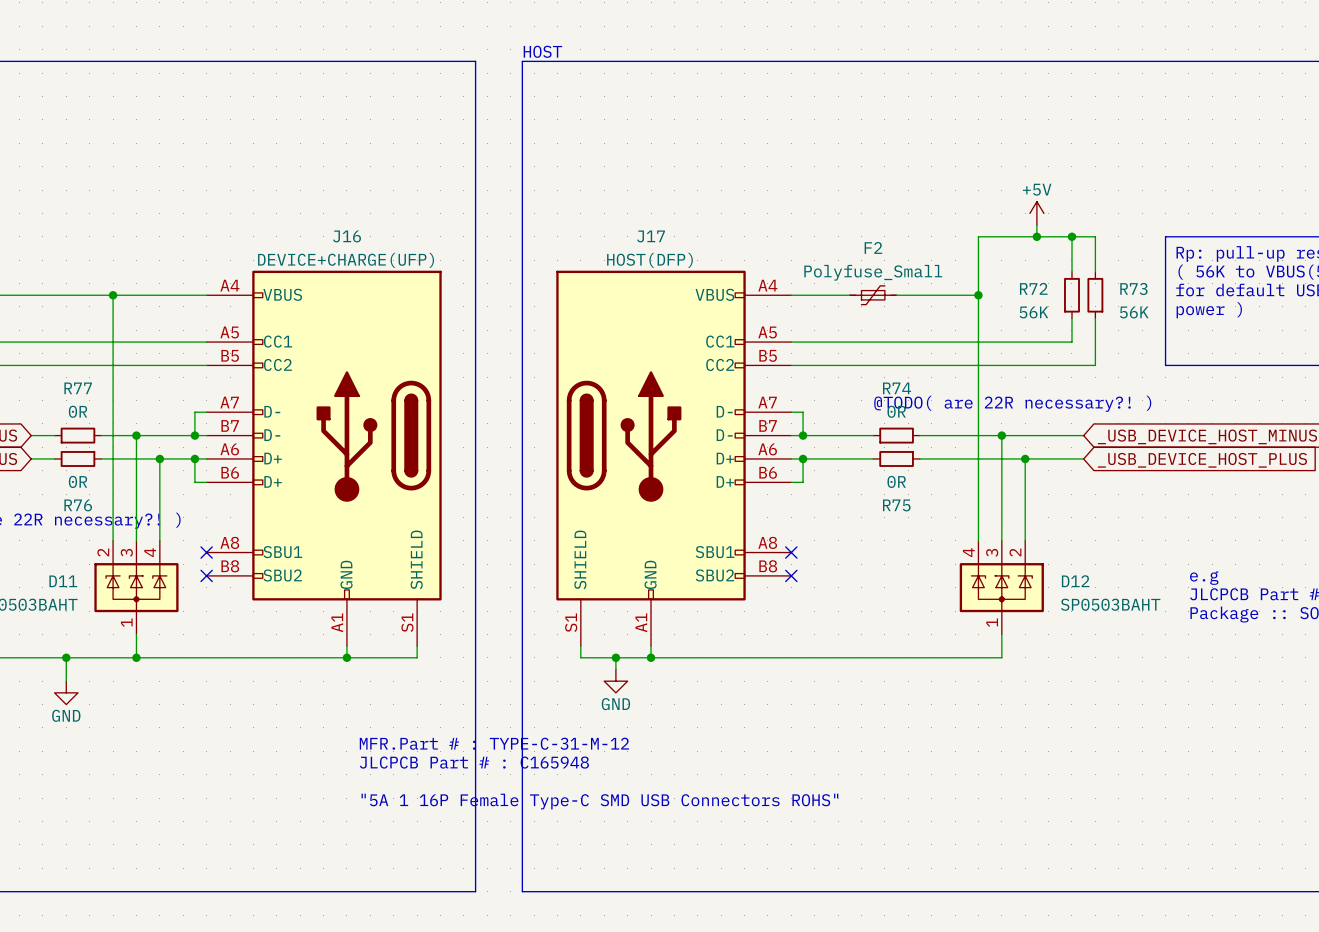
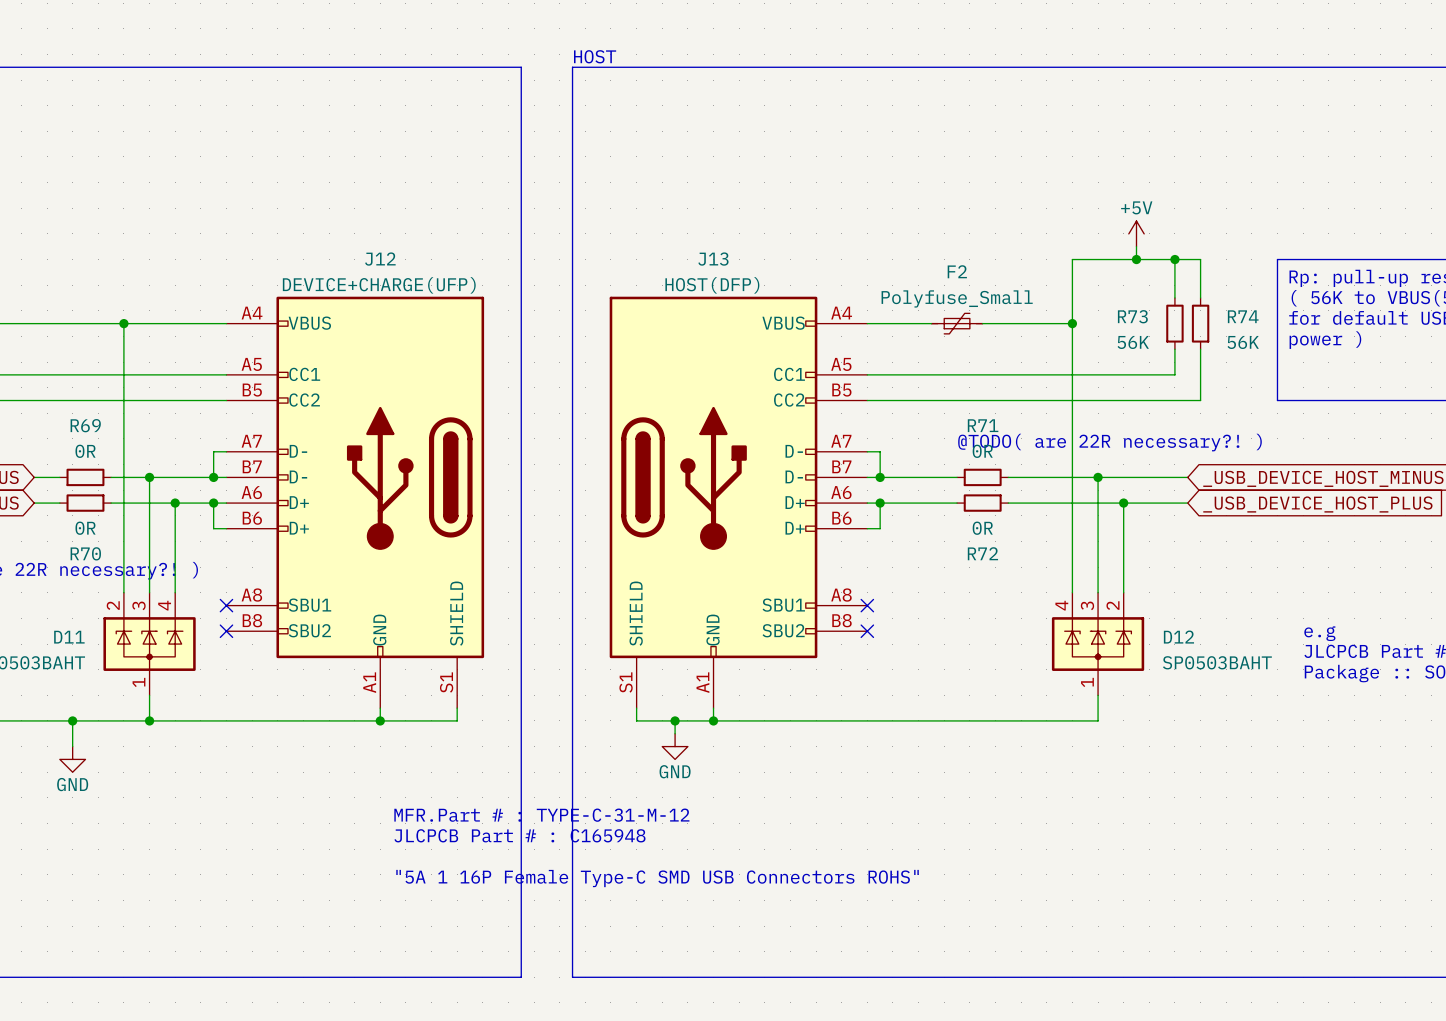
J16 name: J16 (347, 236) -> J12 (380, 259)
J17 name: J17 (651, 236) -> J13 (713, 259)
R72 name: R72 (1033, 288) -> R73 (1132, 316)
R73 name: R73 (1133, 288) -> R74 (1243, 316)
R77 name: R77 (78, 388) -> R69 (85, 425)
R74 name: R74 (897, 388) -> R71 (983, 425)
R76 name: R76 (78, 505) -> R70 (85, 553)
R75 name: R75 (896, 505) -> R72 (982, 553)

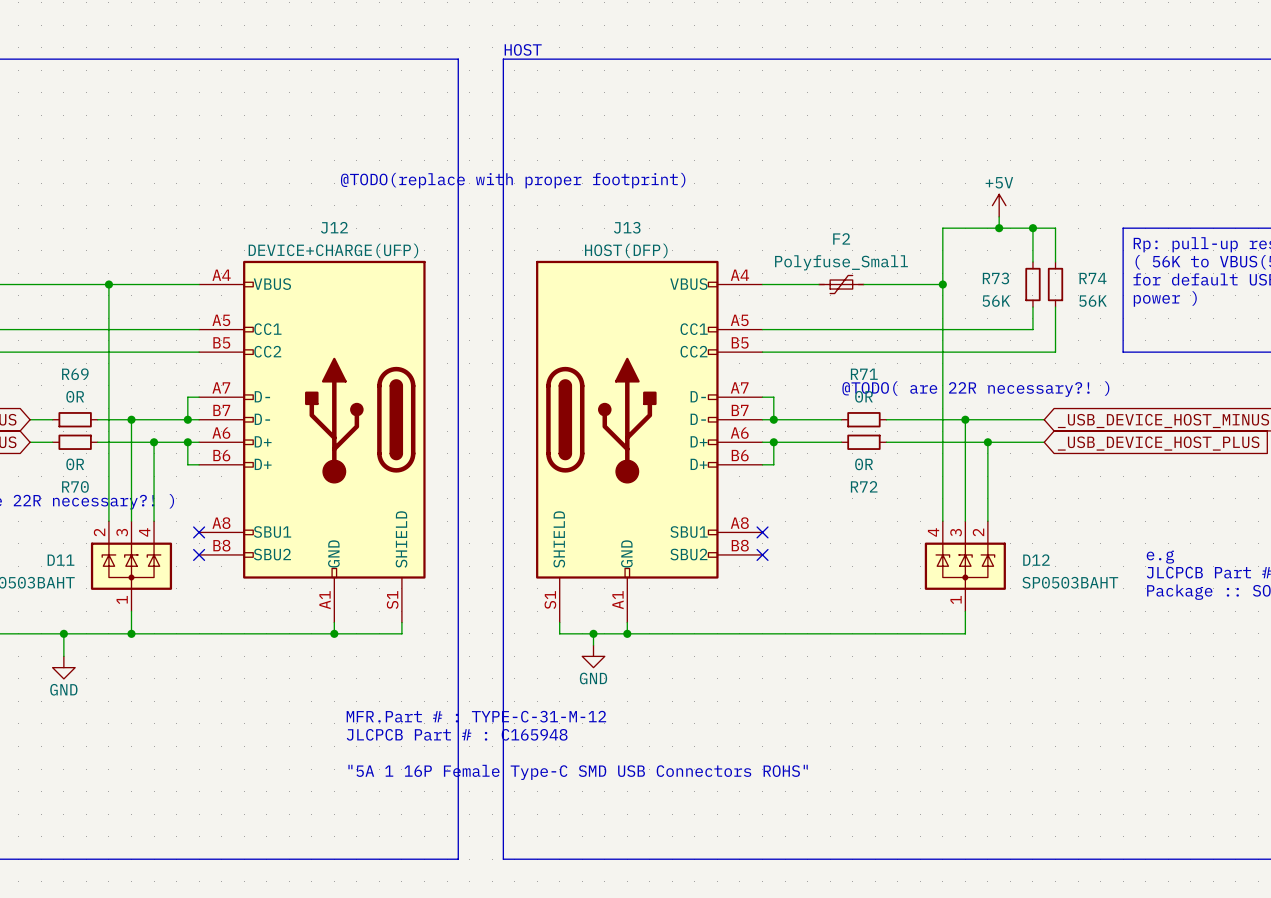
text: none -> @TODO(replace with proper footprint) (513, 180)

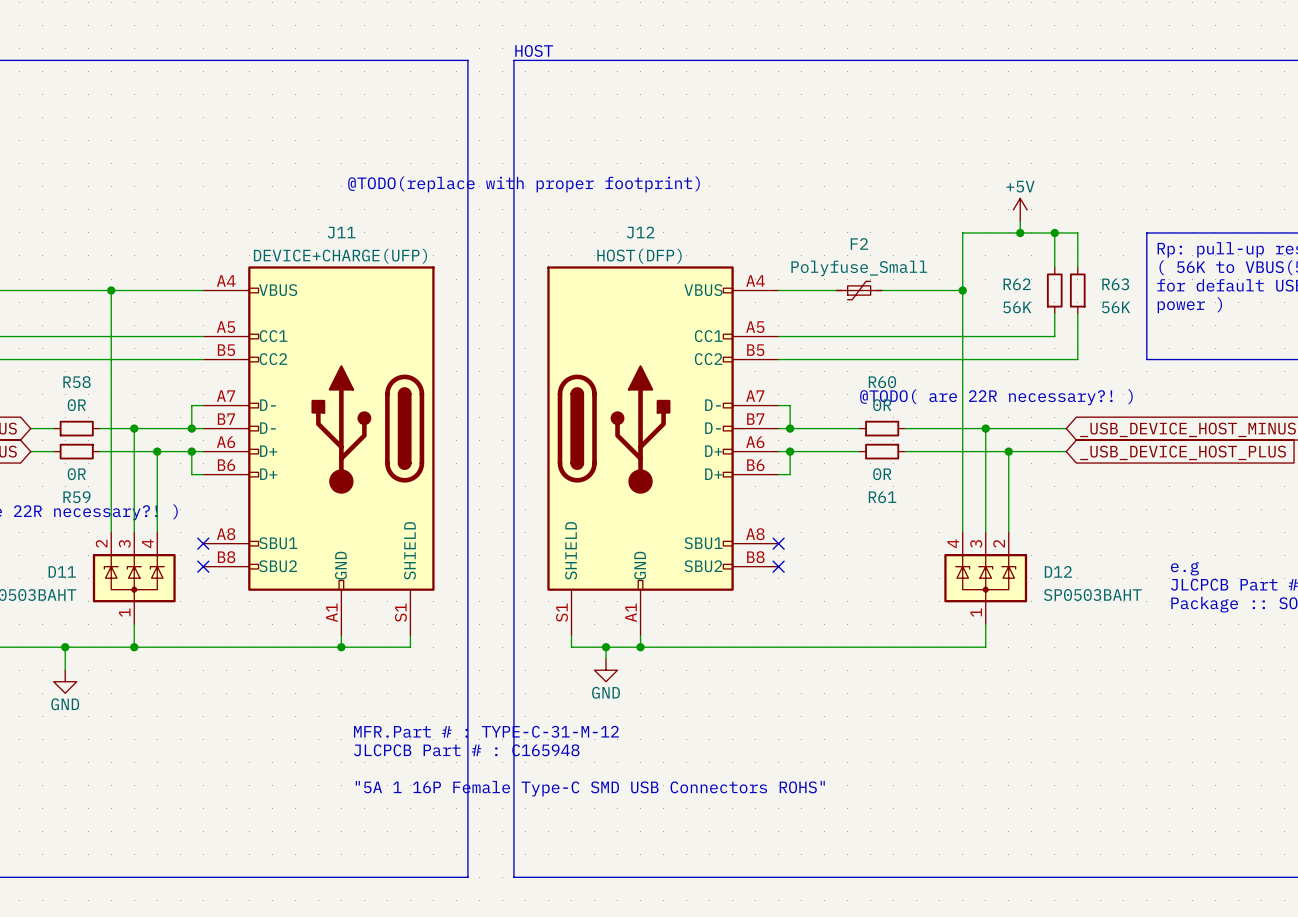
J12 name: J12 (334, 227) -> J11 (341, 232)
J13 name: J13 (627, 227) -> J12 (640, 232)
R73 name: R73 (995, 278) -> R62 (1017, 284)
R74 name: R74 (1093, 278) -> R63 (1115, 284)
R69 name: R69 (75, 374) -> R58 (77, 382)
R71 name: R71 (864, 374) -> R60 (882, 382)
R70 name: R70 (75, 486) -> R59 (76, 497)
R72 name: R72 (864, 486) -> R61 (882, 497)

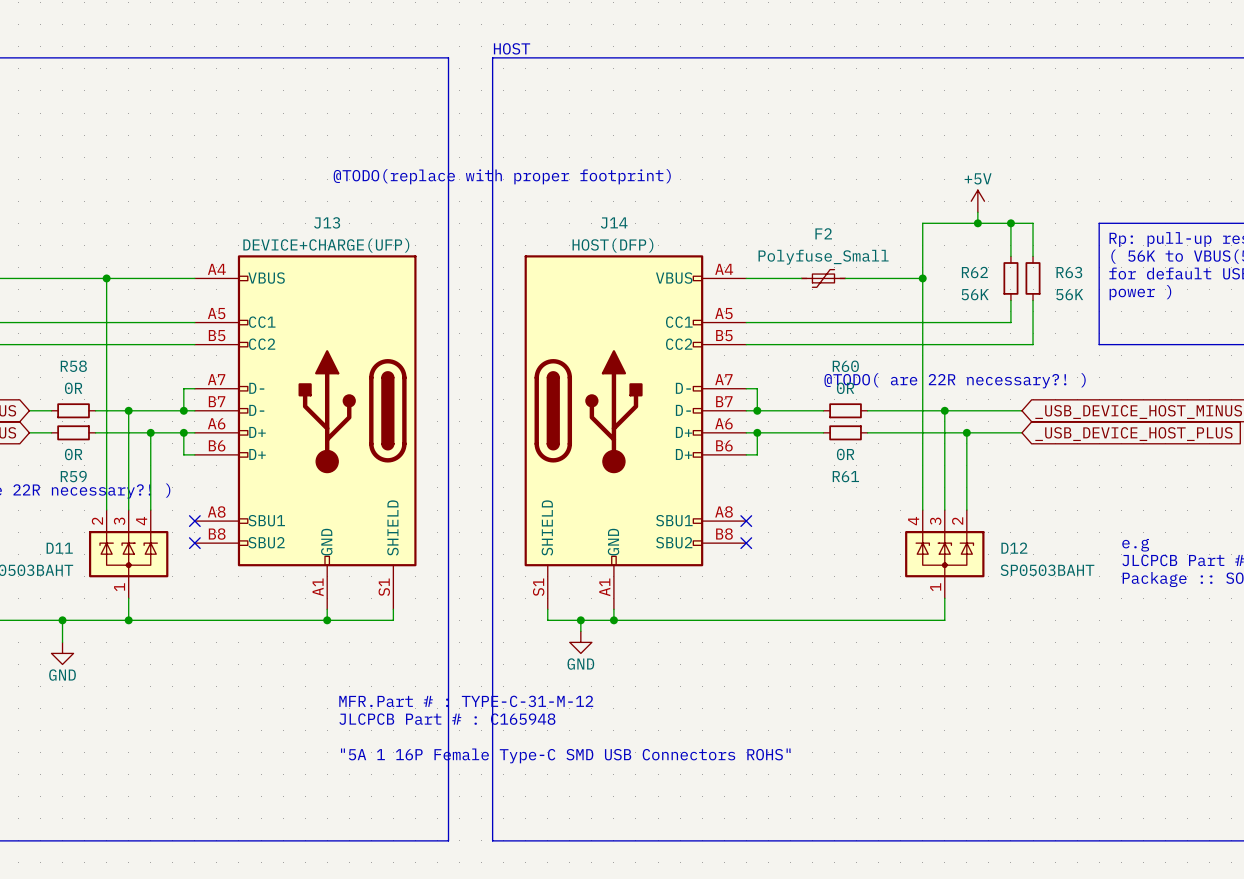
J11 name: J11 (341, 232) -> J13 (327, 222)
J12 name: J12 (640, 232) -> J14 (614, 222)

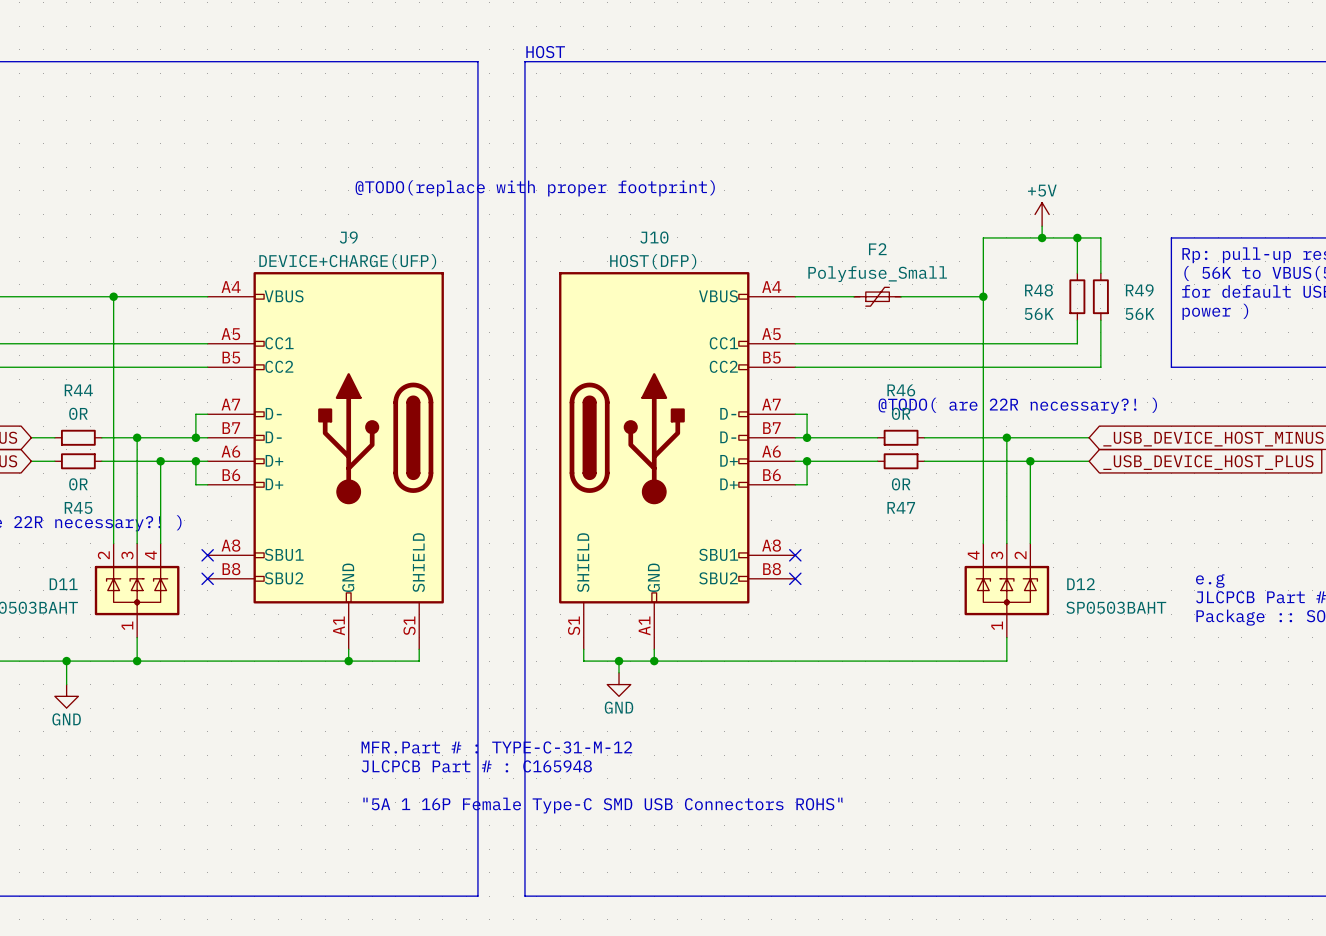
J13 name: J13 (327, 222) -> J9 (348, 237)
J14 name: J14 (614, 222) -> J10 (654, 237)
R62 name: R62 (974, 272) -> R48 (1039, 290)
R63 name: R63 (1069, 272) -> R49 (1139, 290)
R58 name: R58 (73, 366) -> R44 (78, 390)
R60 name: R60 (845, 366) -> R46 (901, 390)
R59 name: R59 (73, 476) -> R45 (78, 507)
R61 name: R61 (845, 476) -> R47 (901, 507)

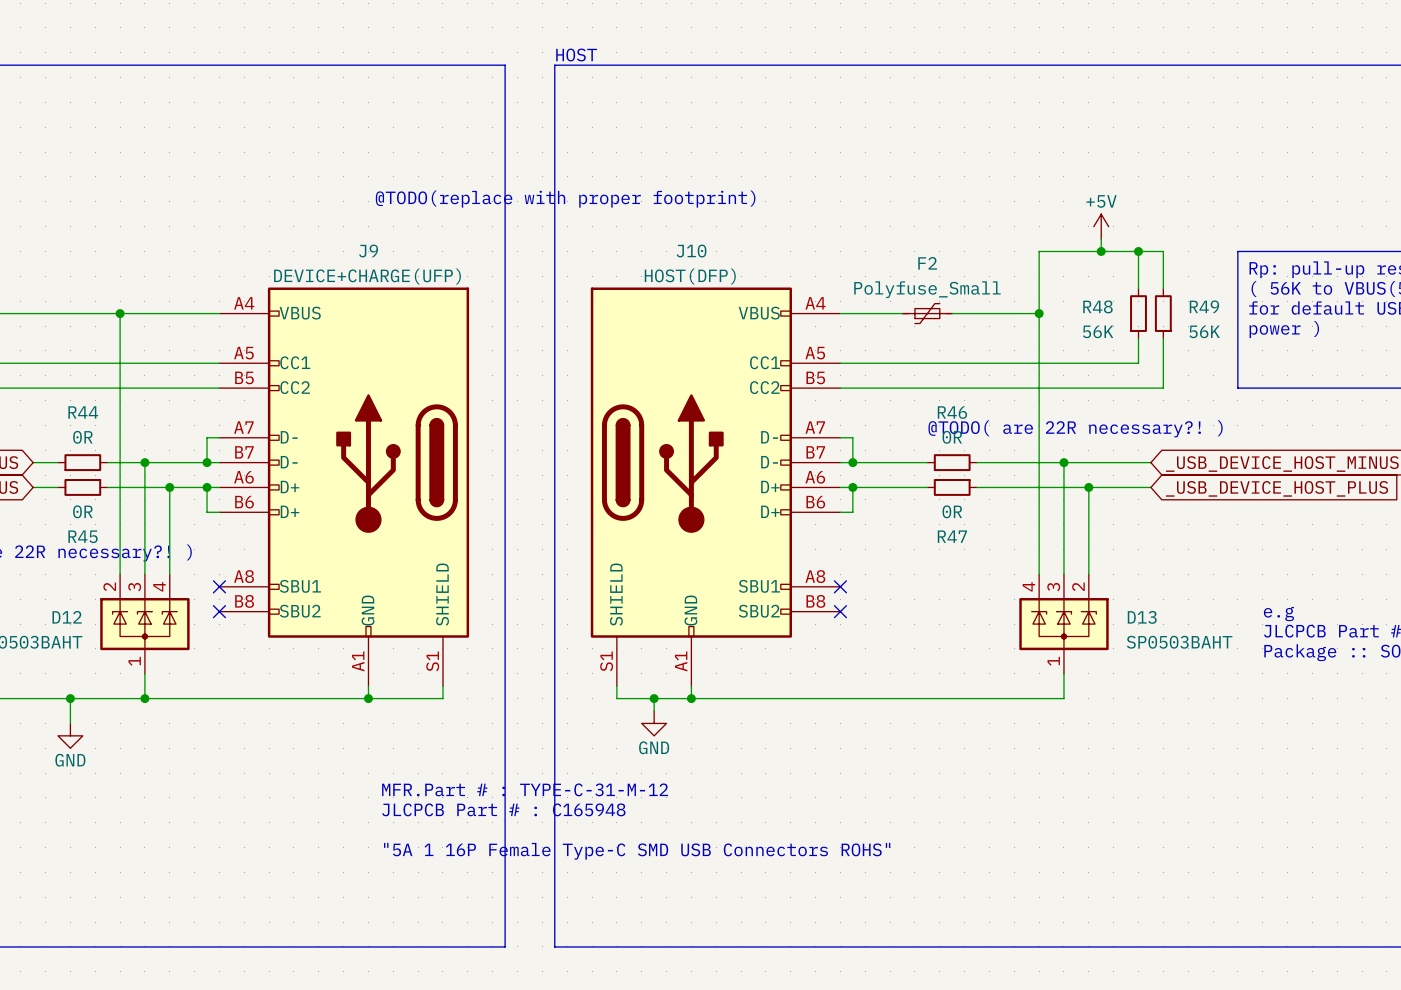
D11 name: D11 (63, 584) -> D12 (67, 617)
D12 name: D12 (1081, 584) -> D13 (1142, 617)

